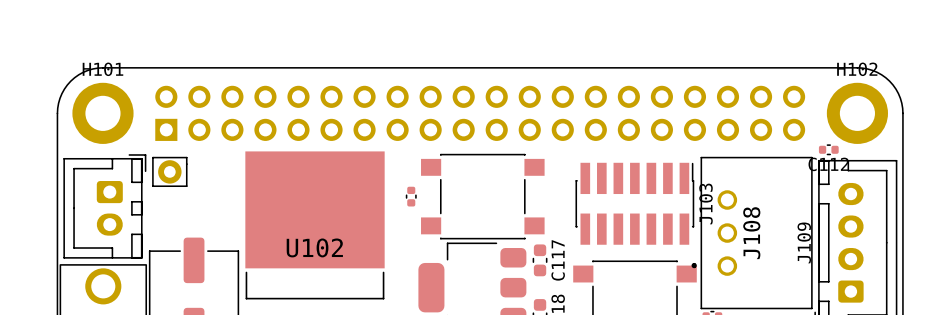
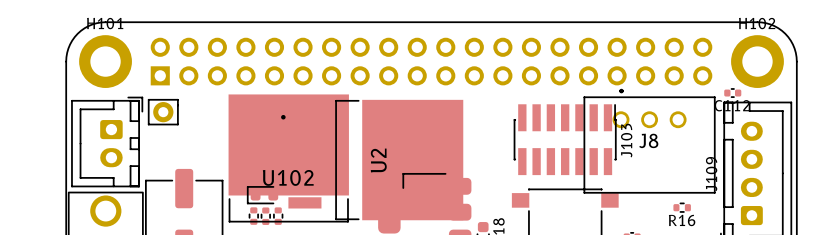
part: (411, 196) -> none
part: (482, 196) -> none
J8: none -> (649, 141)
U2: none -> (372, 160)
J108: (752, 233) -> none
C117: (540, 260) -> none
part: none -> (262, 195)
R16: none -> (682, 207)
part: none -> (253, 216)
part: none -> (265, 216)
part: none -> (278, 216)

